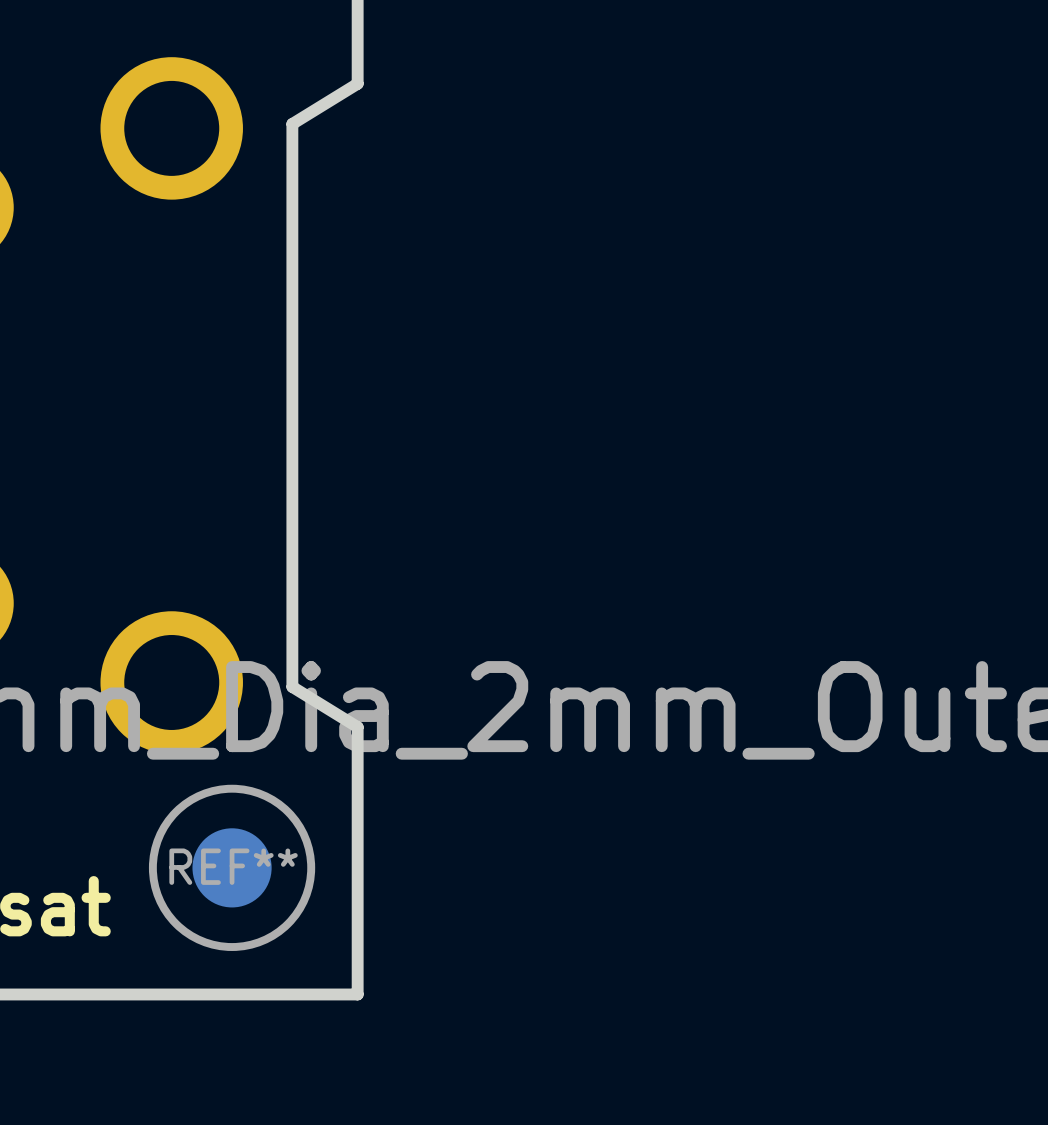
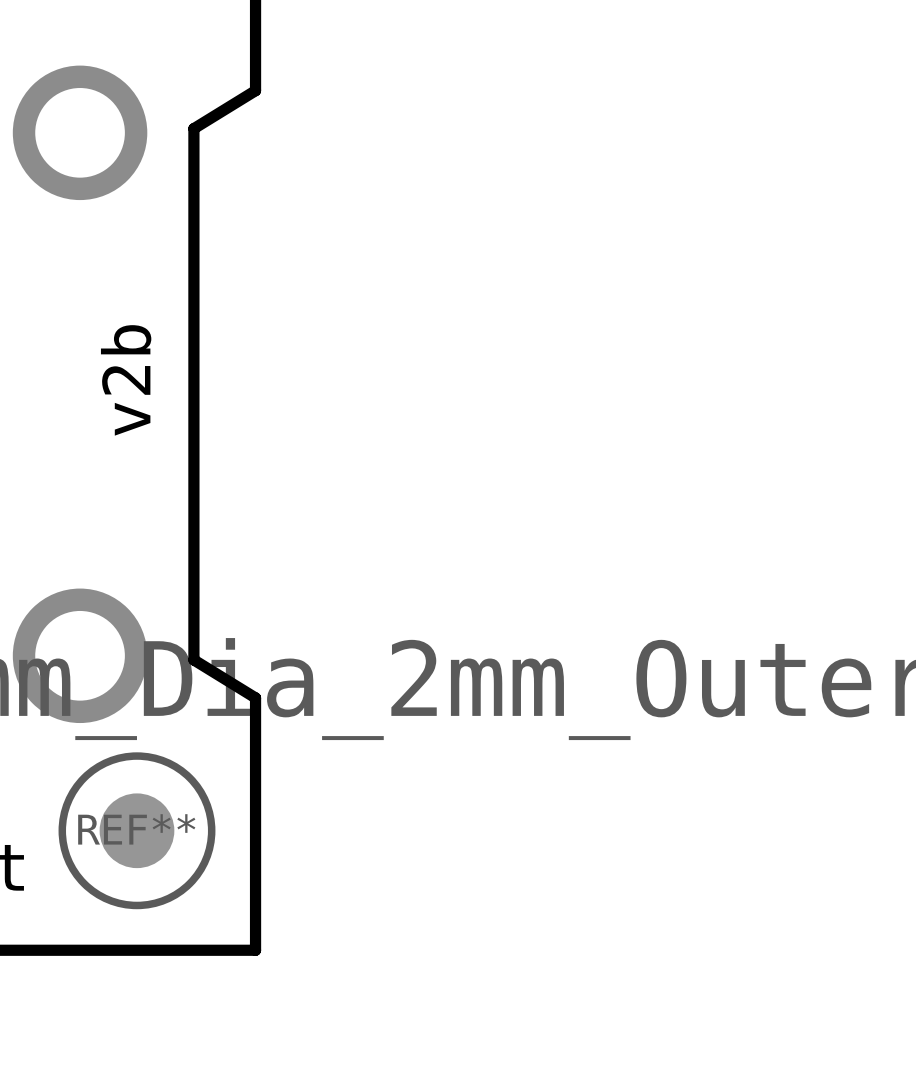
text: none -> v2b (126, 380)

